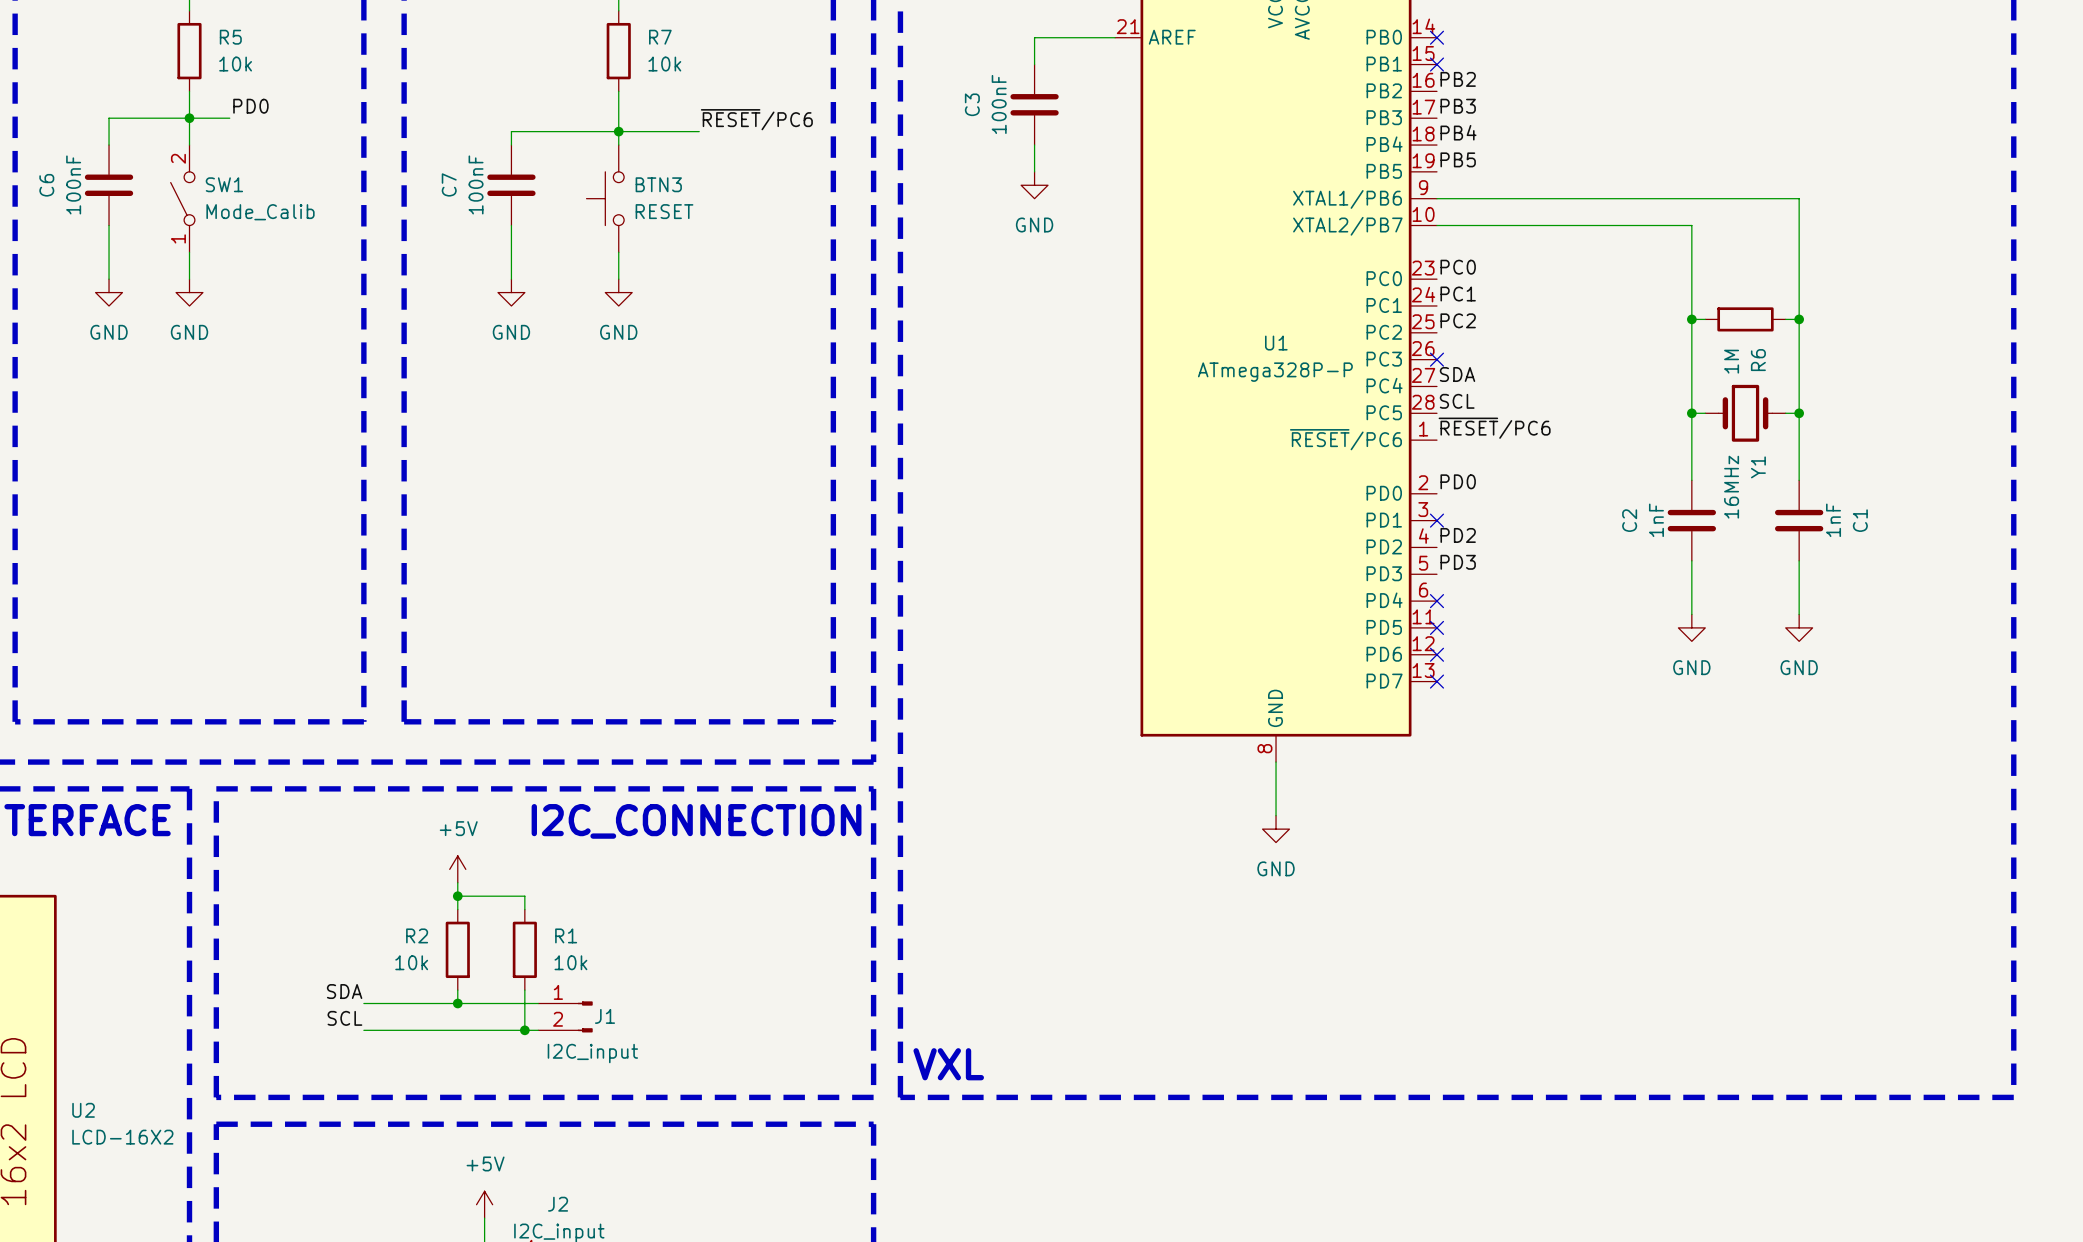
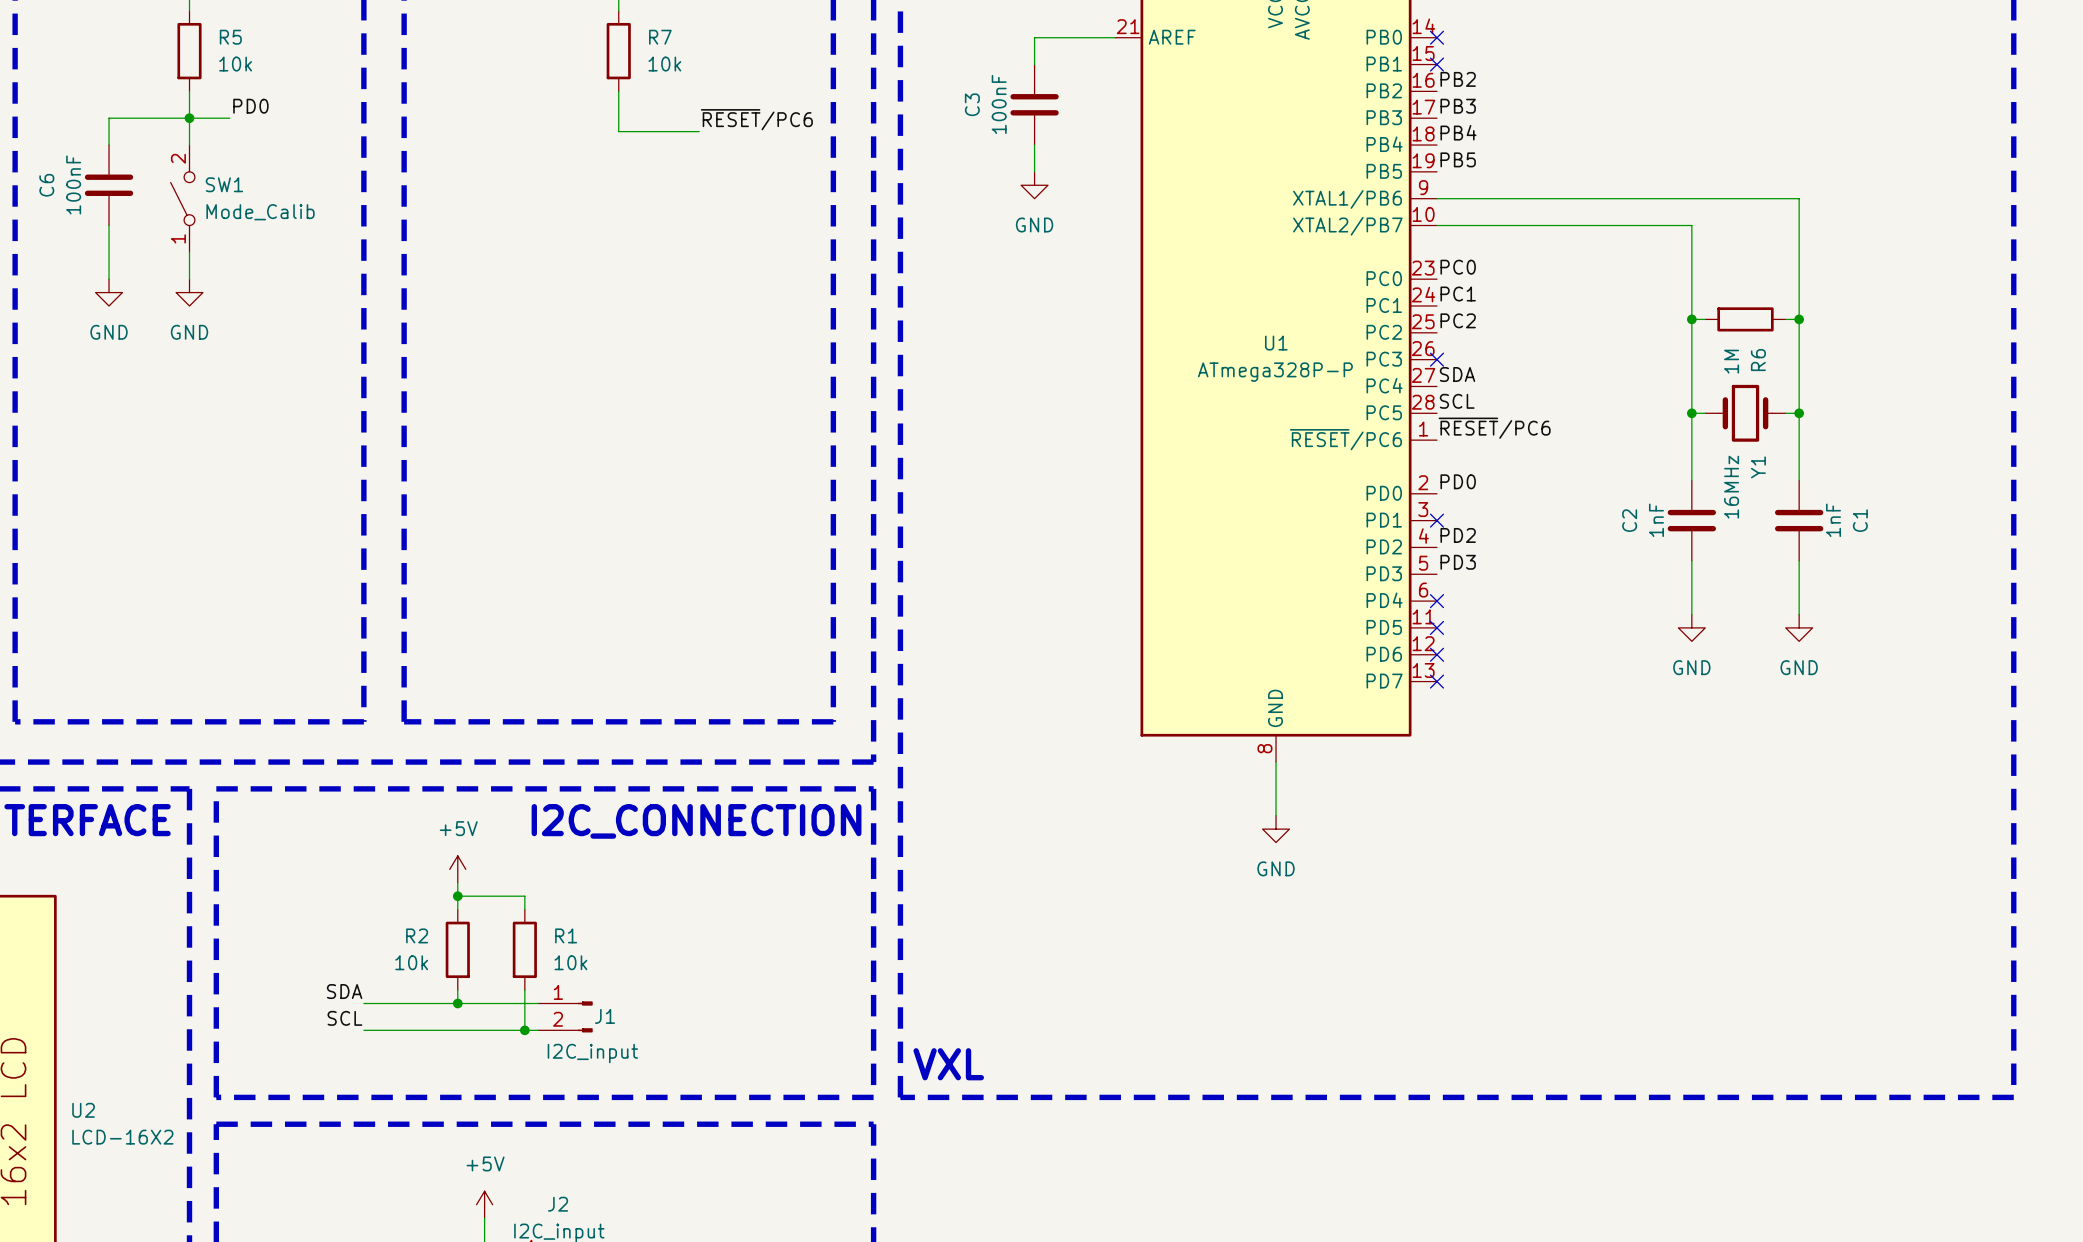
junction: (618, 131) -> none
wire: (511, 145) (511, 131) (618, 131) (618, 145) -> none
C7: 100nF (511, 185) -> none
BTN3: RESET (605, 198) -> none
wire: (511, 225) (511, 279) -> none
wire: (618, 252) (618, 279) -> none
power symbol: GND (511, 292) -> none
power symbol: GND (618, 292) -> none

